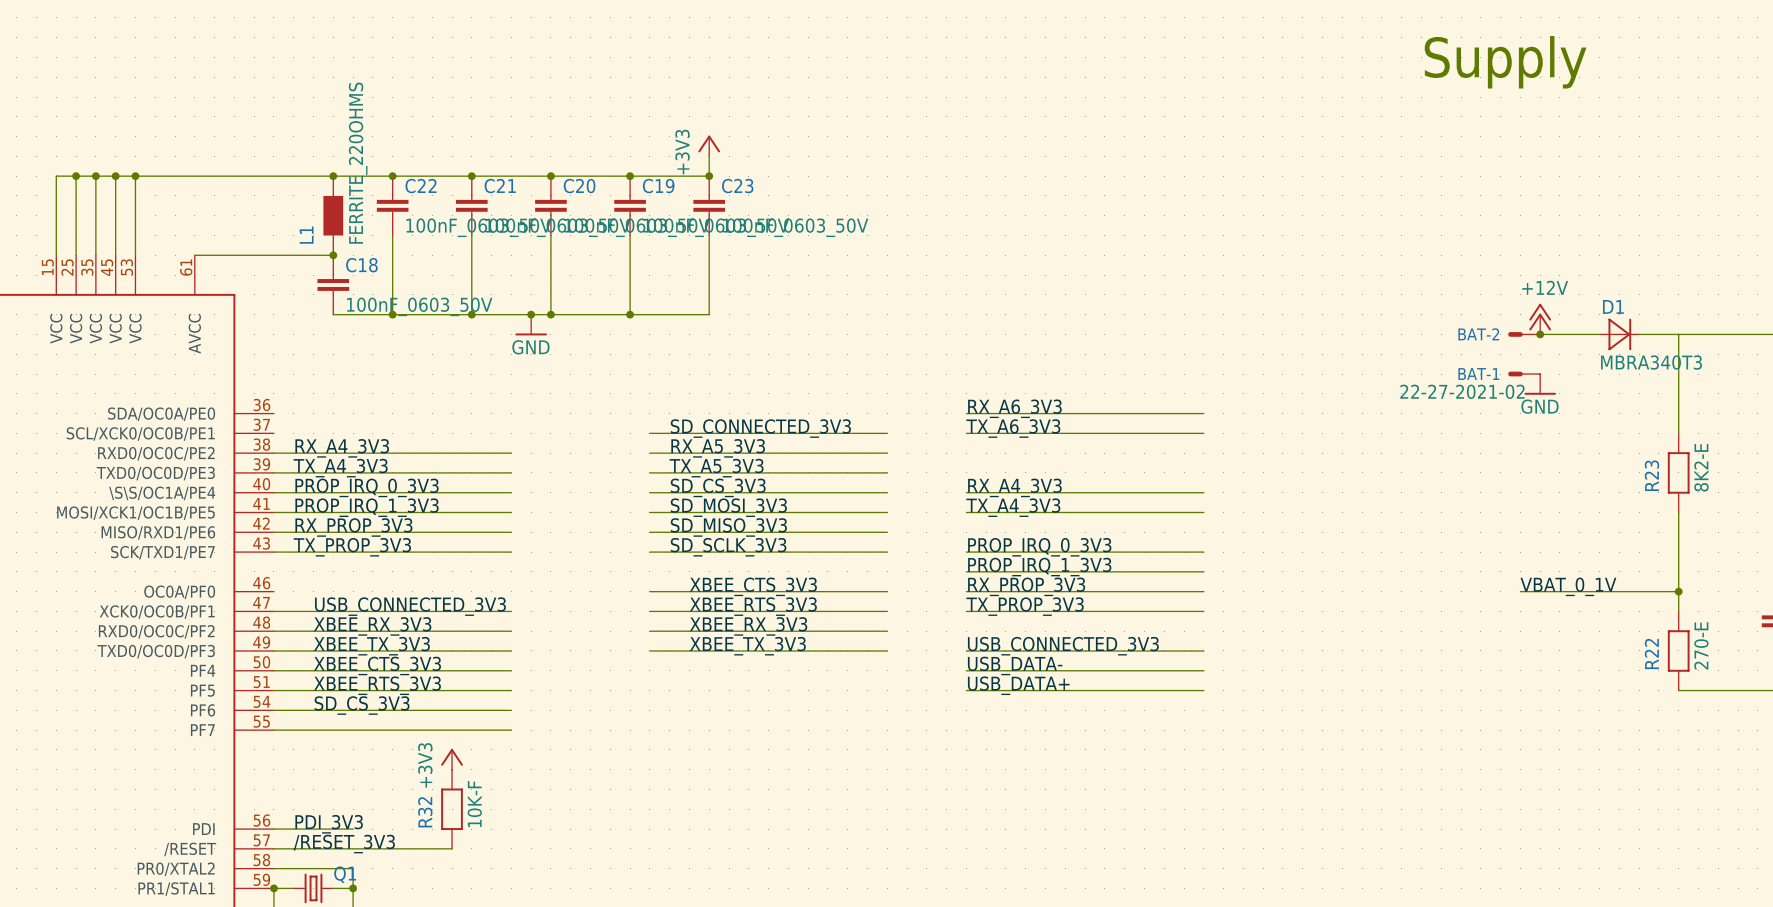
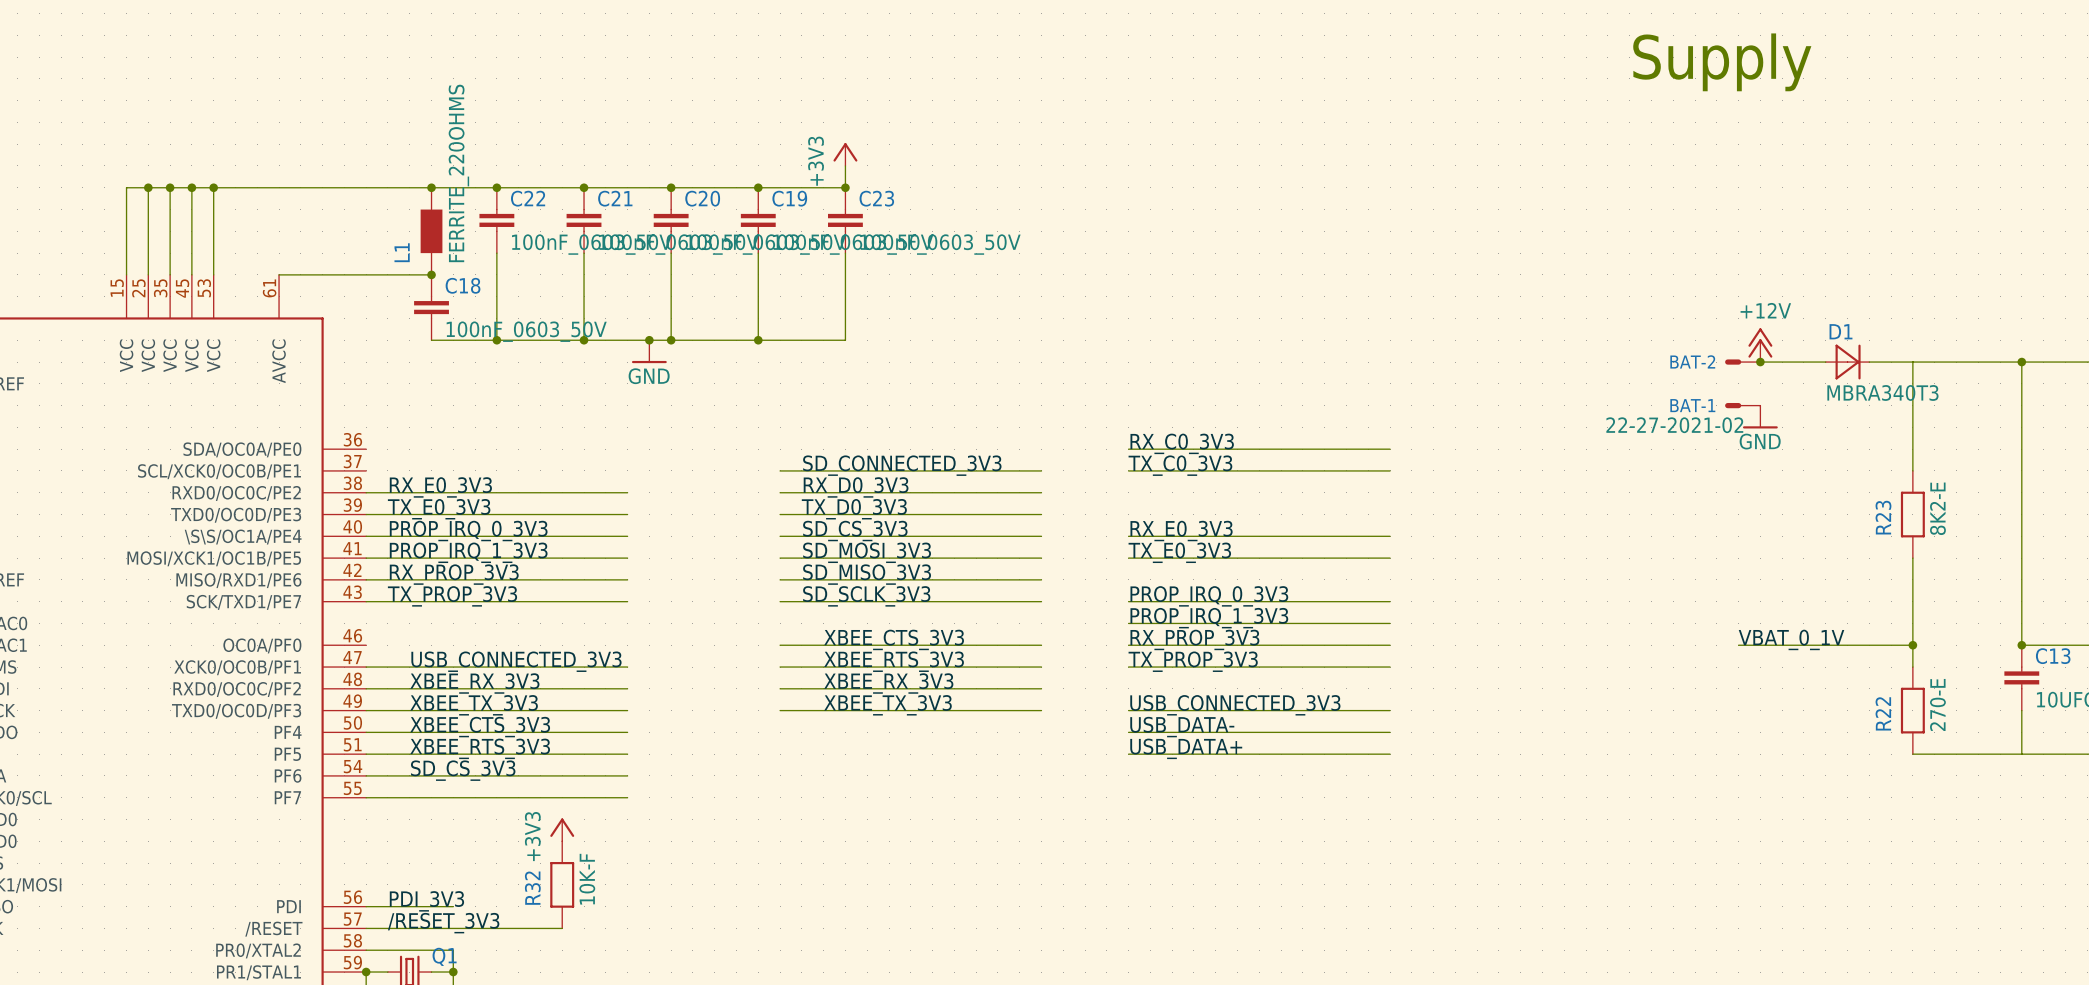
label: RX_A6_3V3 (1014, 408) -> RX_C0_3V3 (1182, 443)
label: TX_A6_3V3 (1013, 428) -> TX_C0_3V3 (1180, 465)
label: RX_A4_3V3 (342, 448) -> RX_E0_3V3 (440, 487)
label: RX_A5_3V3 (718, 448) -> RX_D0_3V3 (856, 487)
label: TX_A4_3V3 (340, 468) -> TX_E0_3V3 (439, 509)
label: TX_A5_3V3 (716, 468) -> TX_D0_3V3 (854, 509)
label: RX_A4_3V3 (1014, 487) -> RX_E0_3V3 (1181, 531)
label: TX_A4_3V3 (1013, 507) -> TX_E0_3V3 (1179, 552)

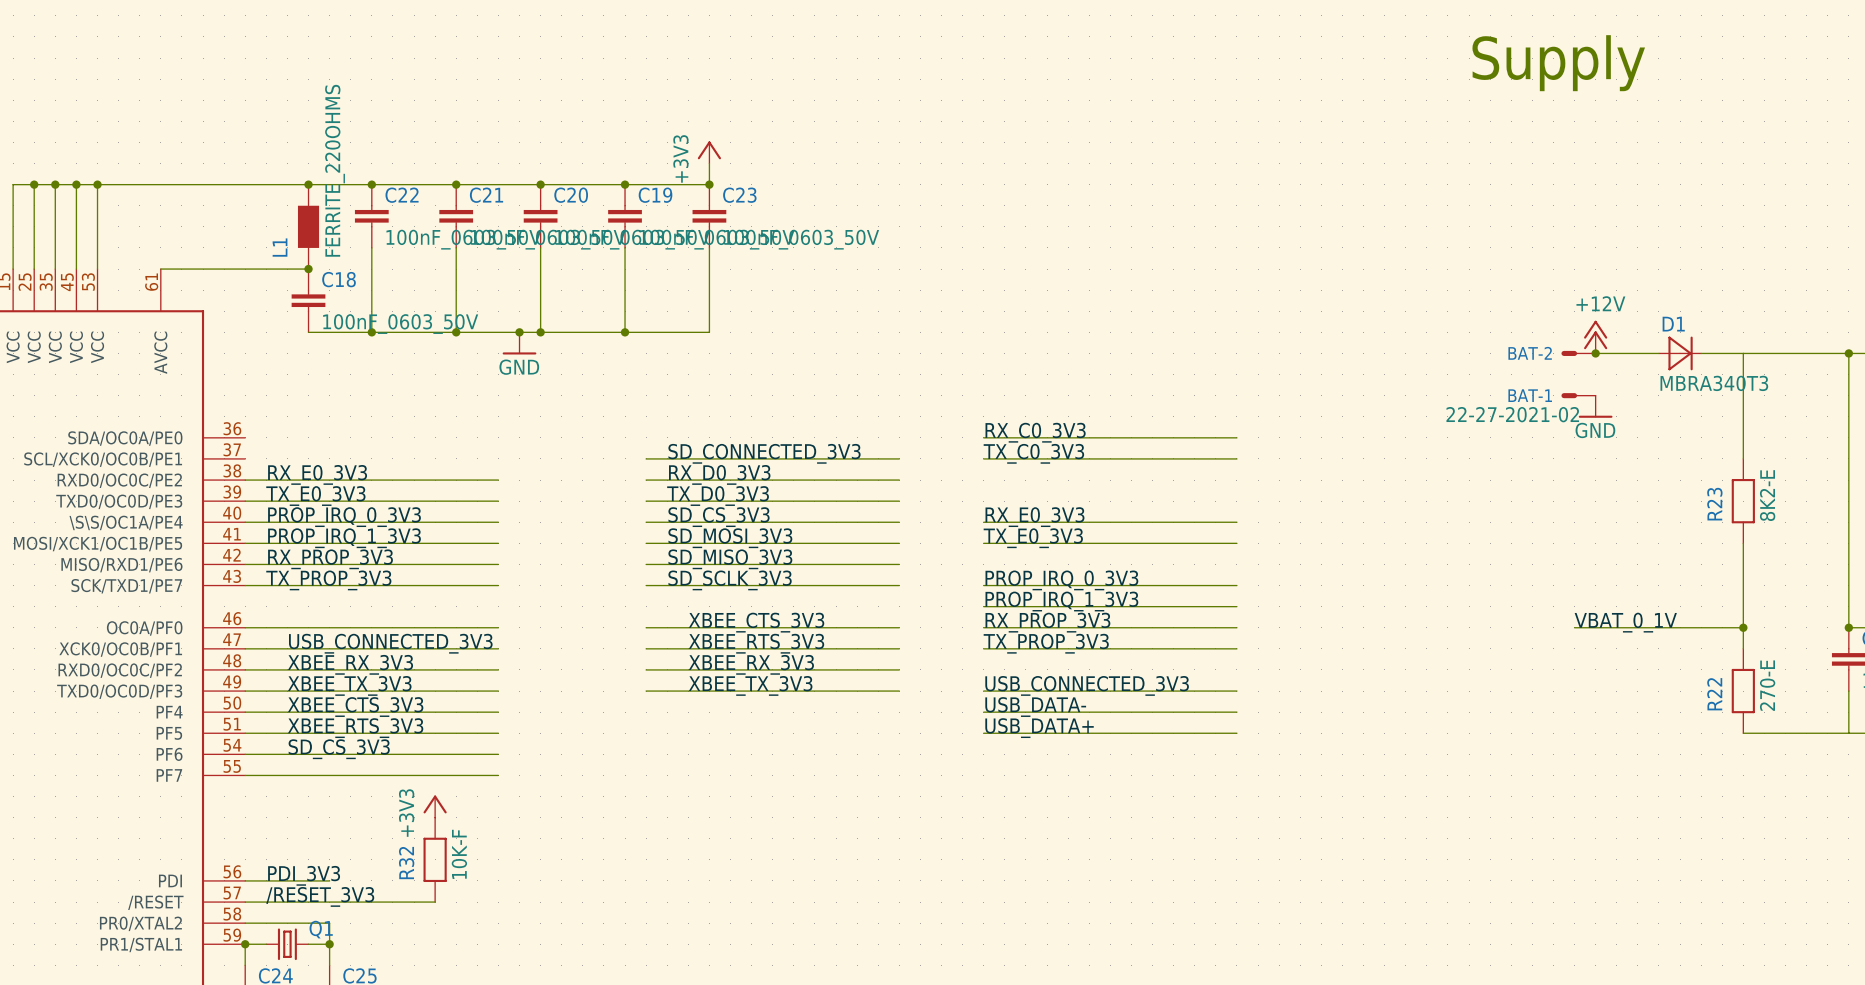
wire: none -> (245, 627) (498, 627)

